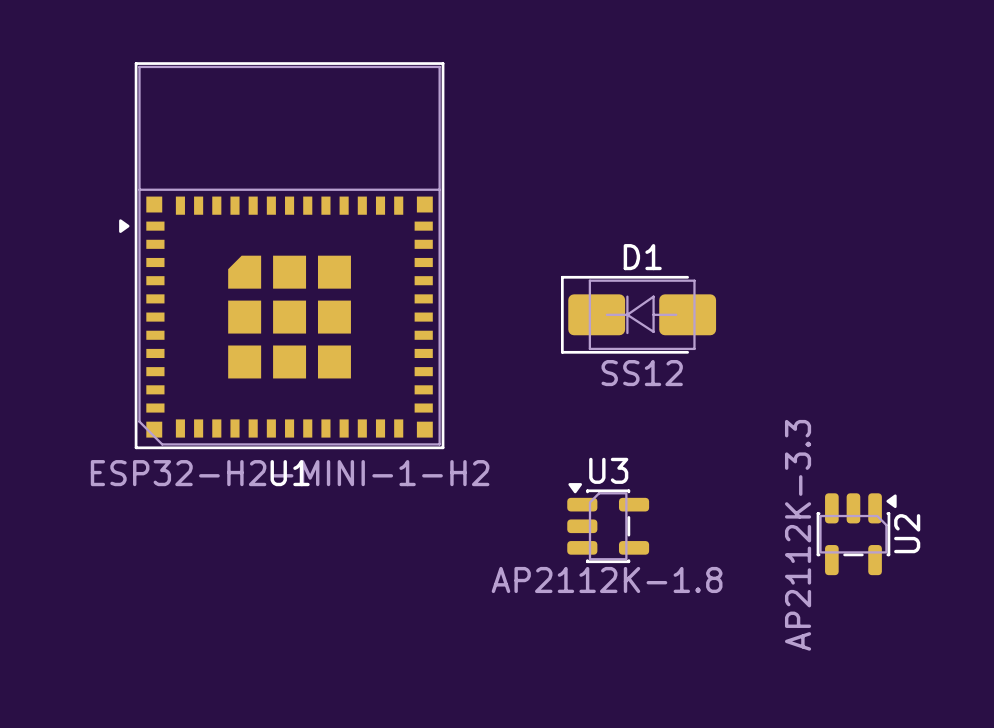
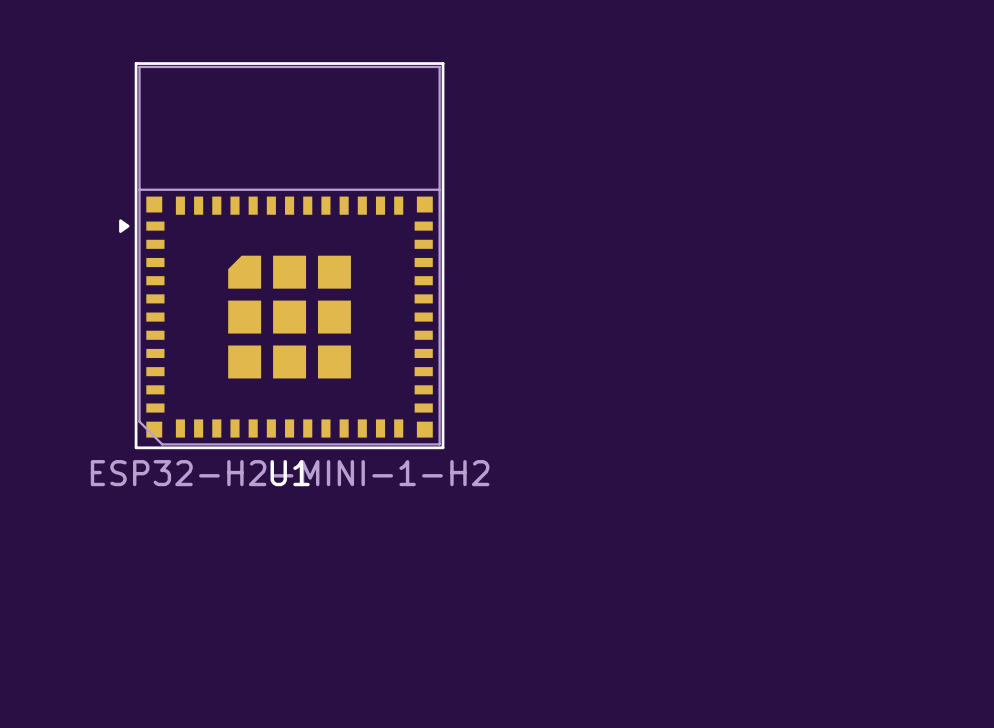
D1: SS12 (638, 314) -> none
U3: AP2112K-1.8 (608, 523) -> none
U2: AP2112K-3.3 (856, 534) -> none

